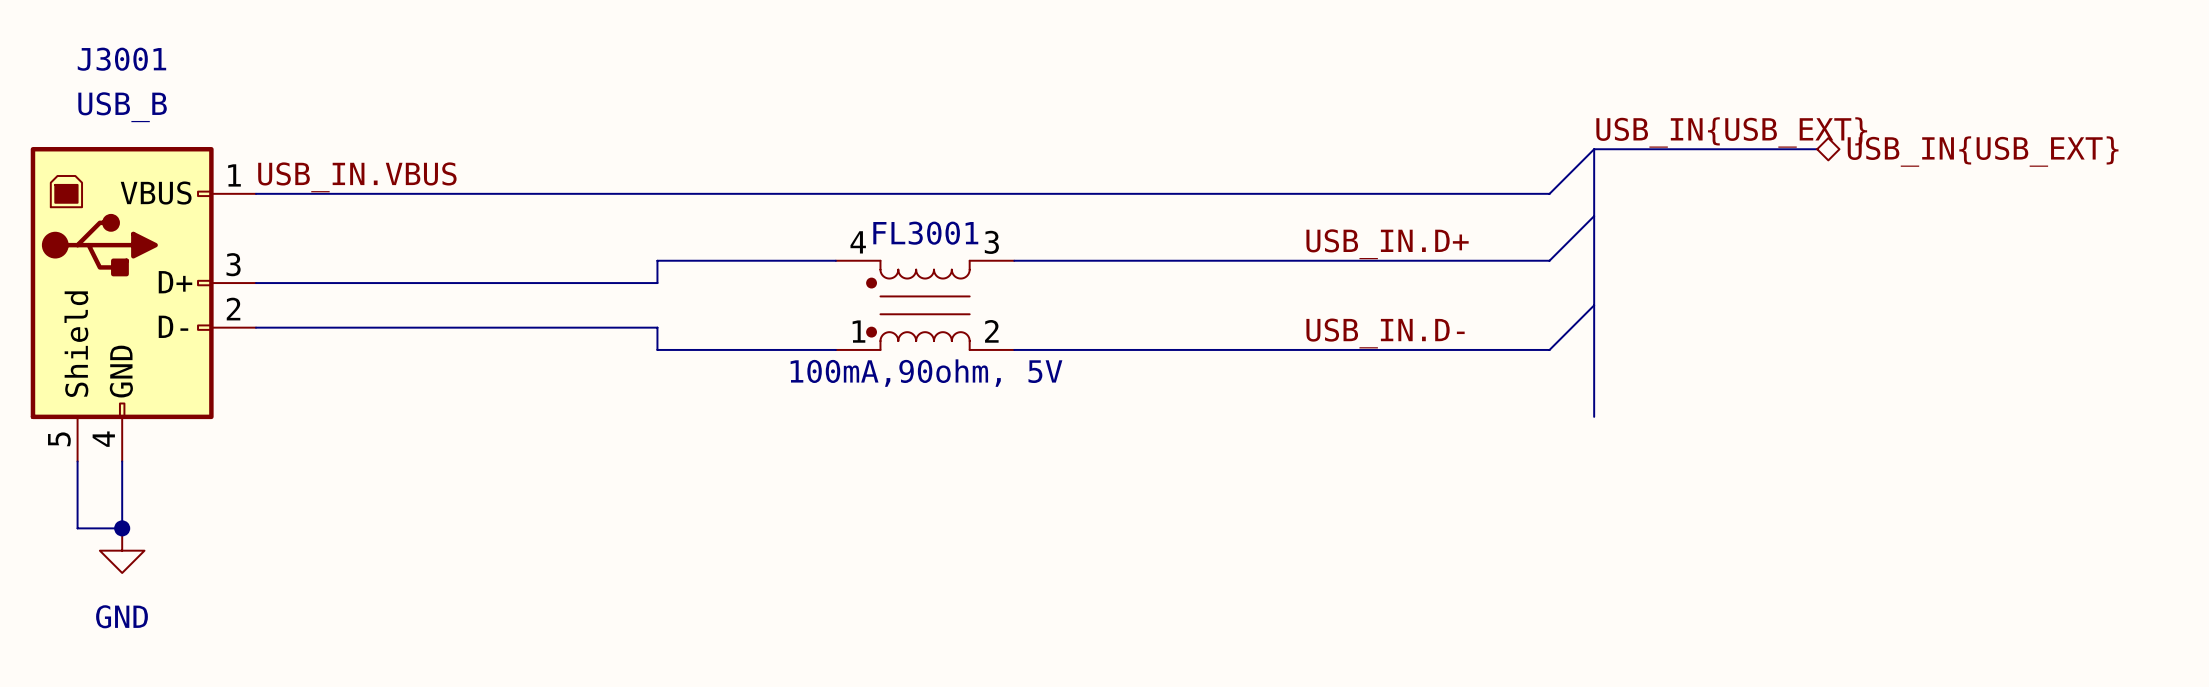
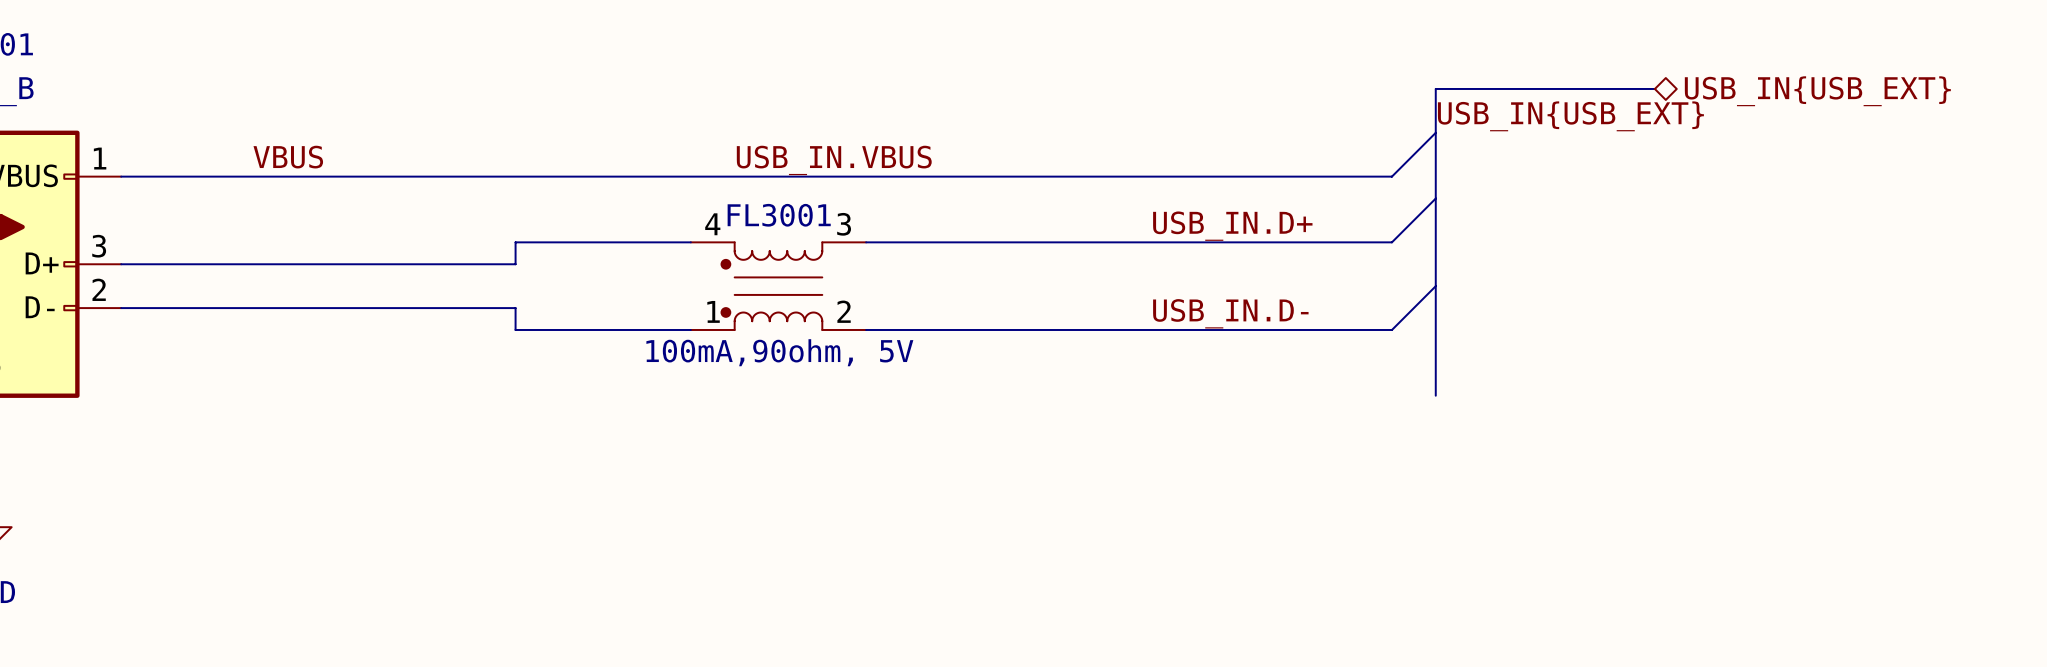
bus: (1594, 149) (1817, 149) -> (1435, 132) (1435, 88) (1654, 88)
hierarchical label position: USB_IN{USB_EXT} (1983, 151) -> USB_IN{USB_EXT} (1817, 91)
label: none -> VBUS (288, 157)
label: USB_IN.VBUS (357, 177) -> none
label: none -> USB_IN.VBUS (834, 160)

